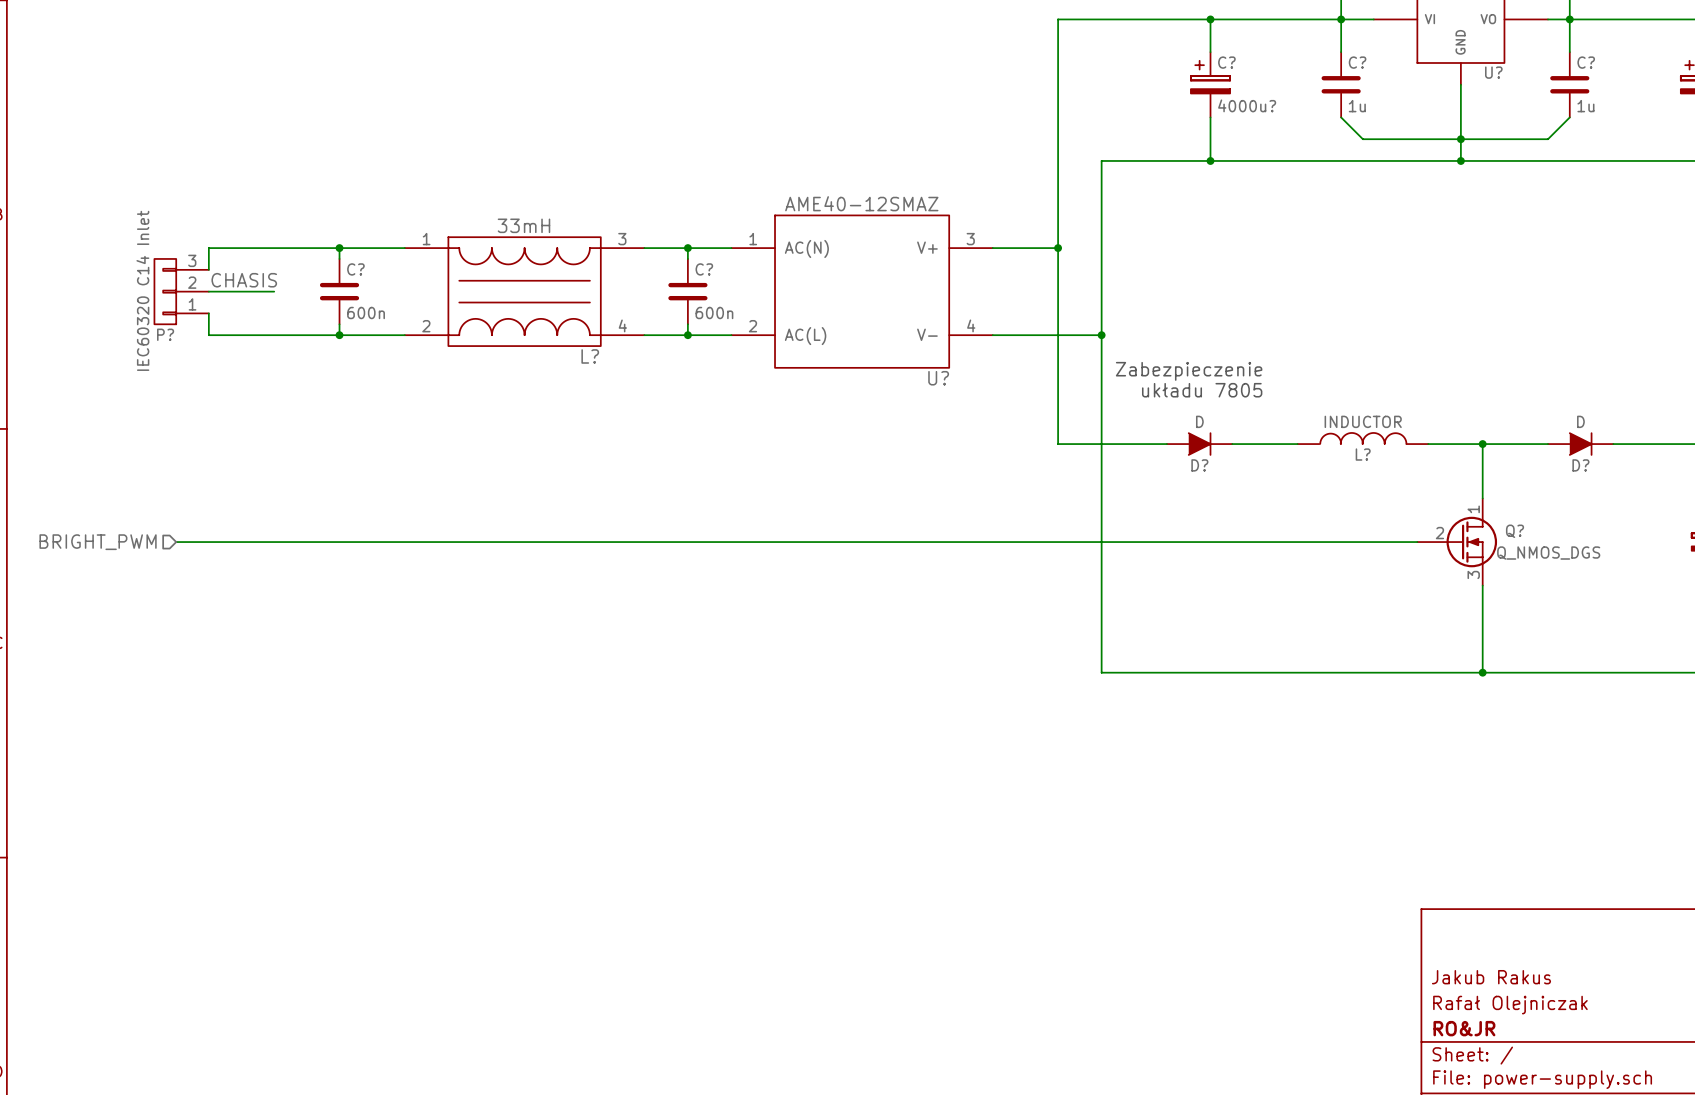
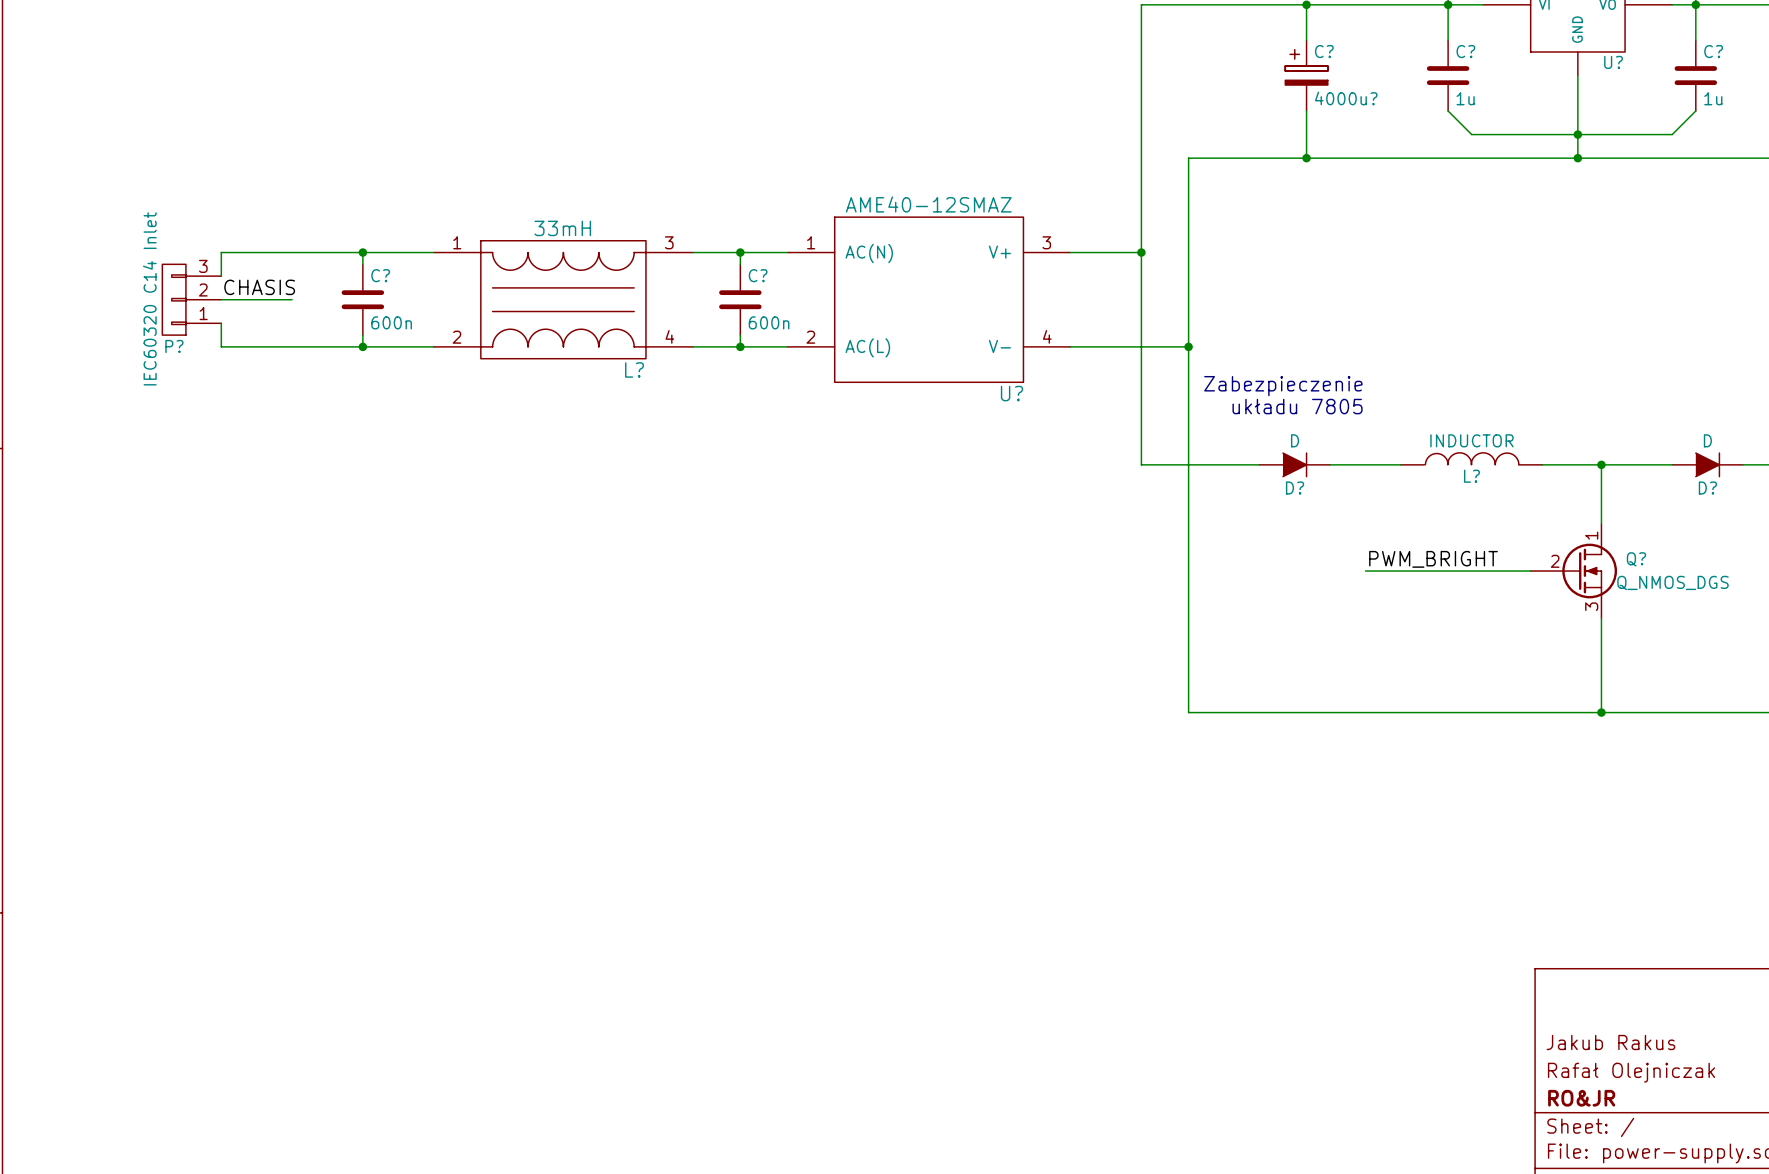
label: none -> PWM_BRIGHT (1433, 559)
hierarchical label: BRIGHT_PWM (98, 542) -> none
wire: (176, 542) (1264, 542) -> none

